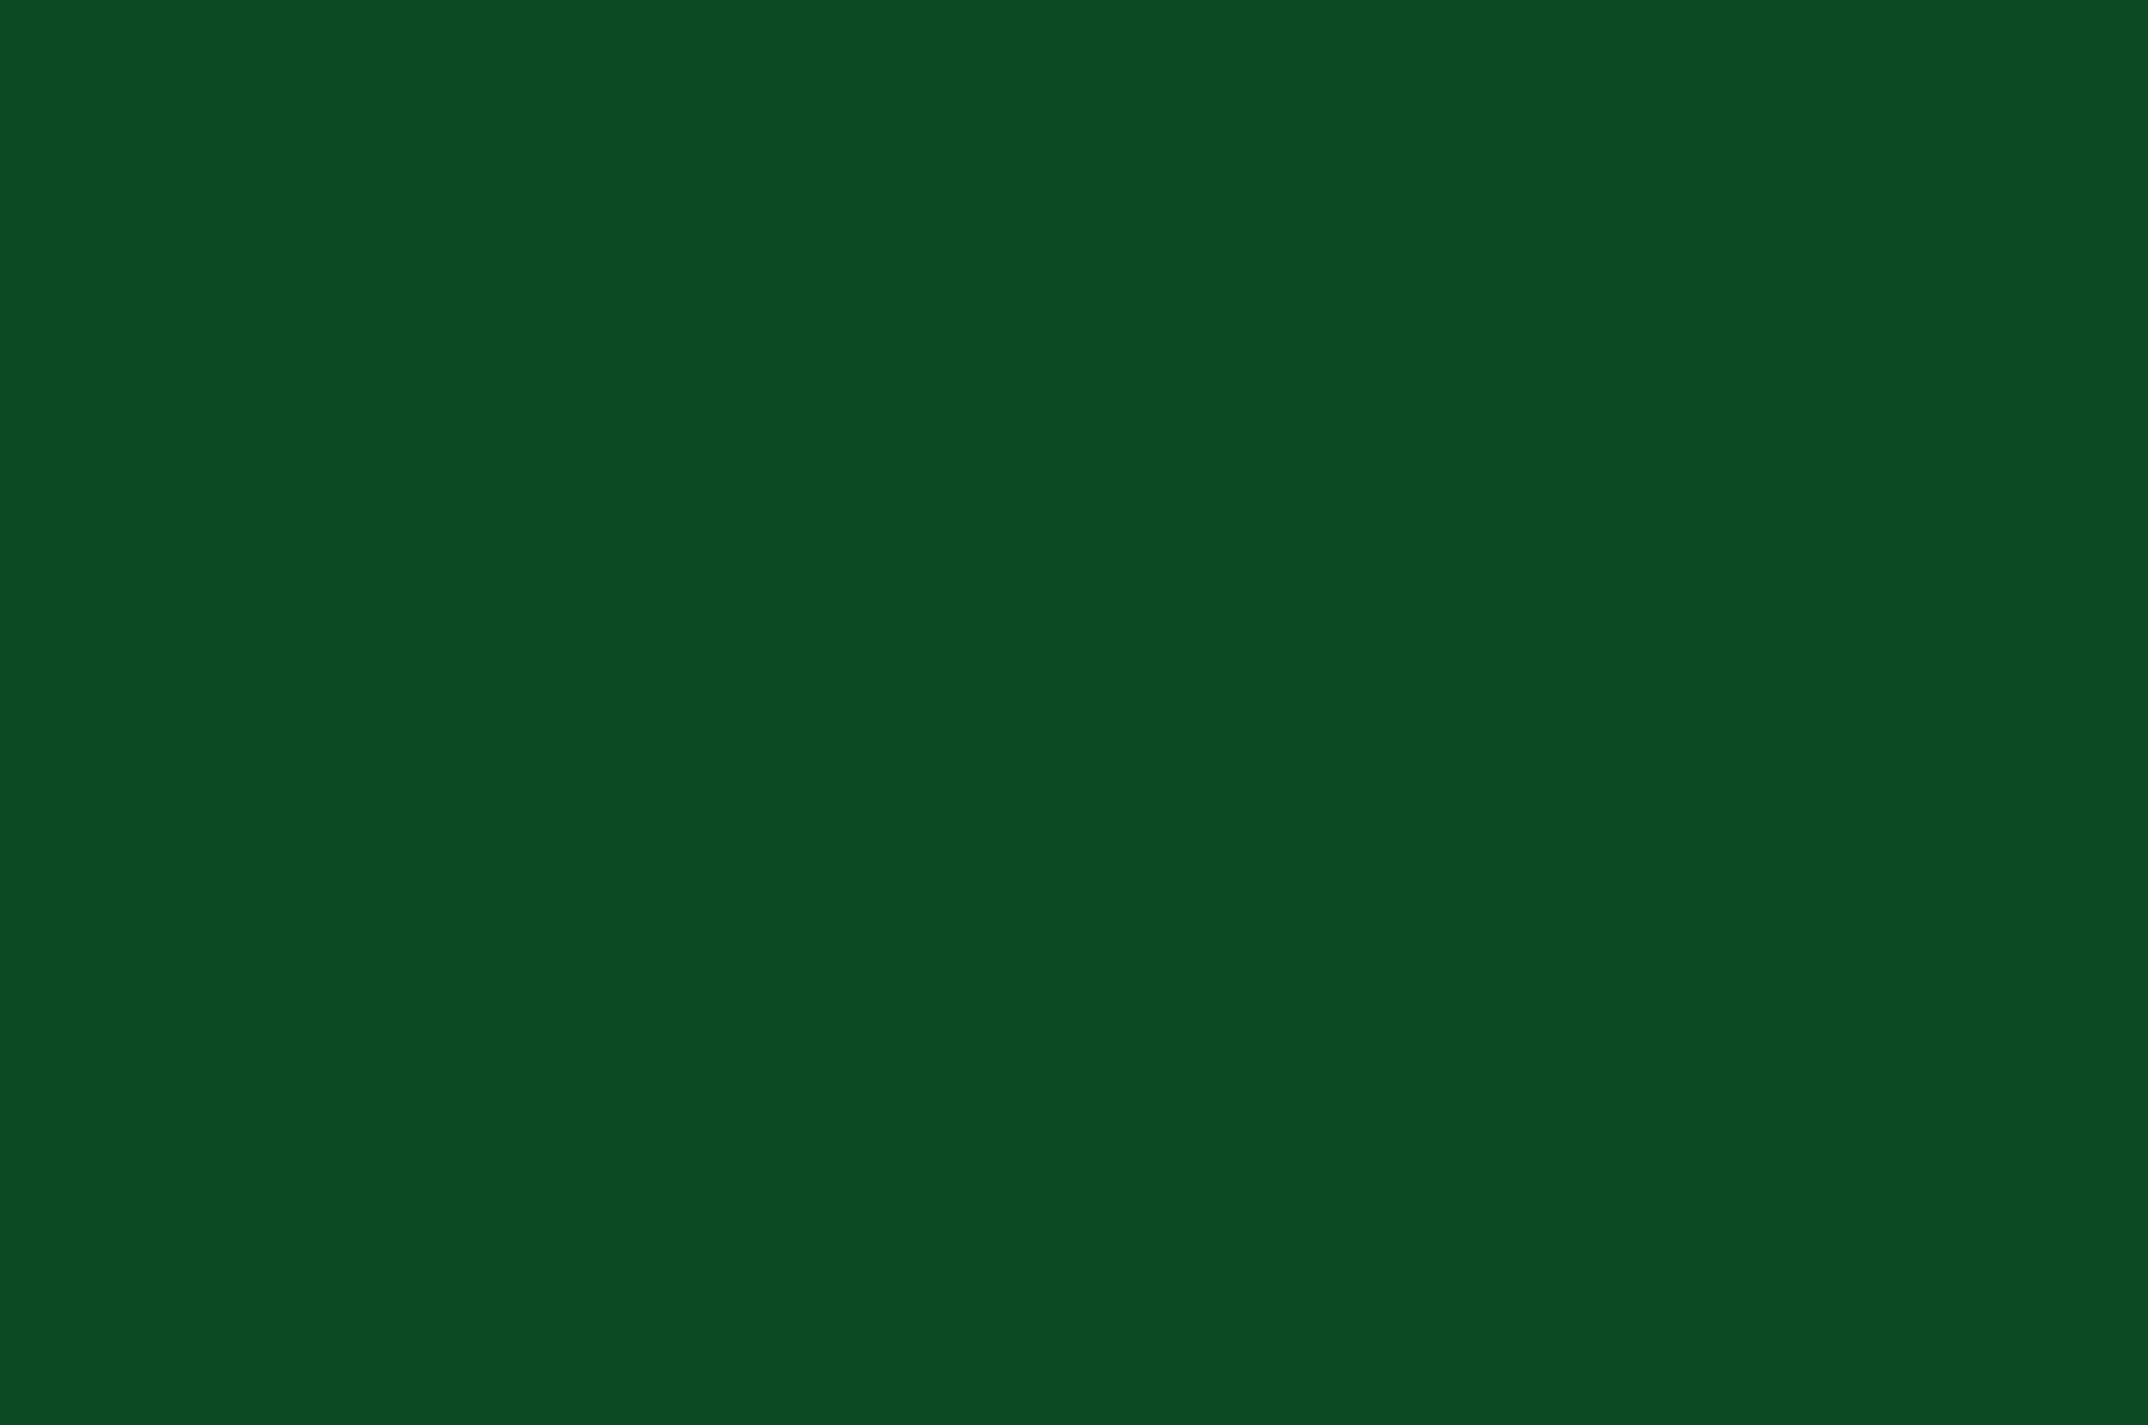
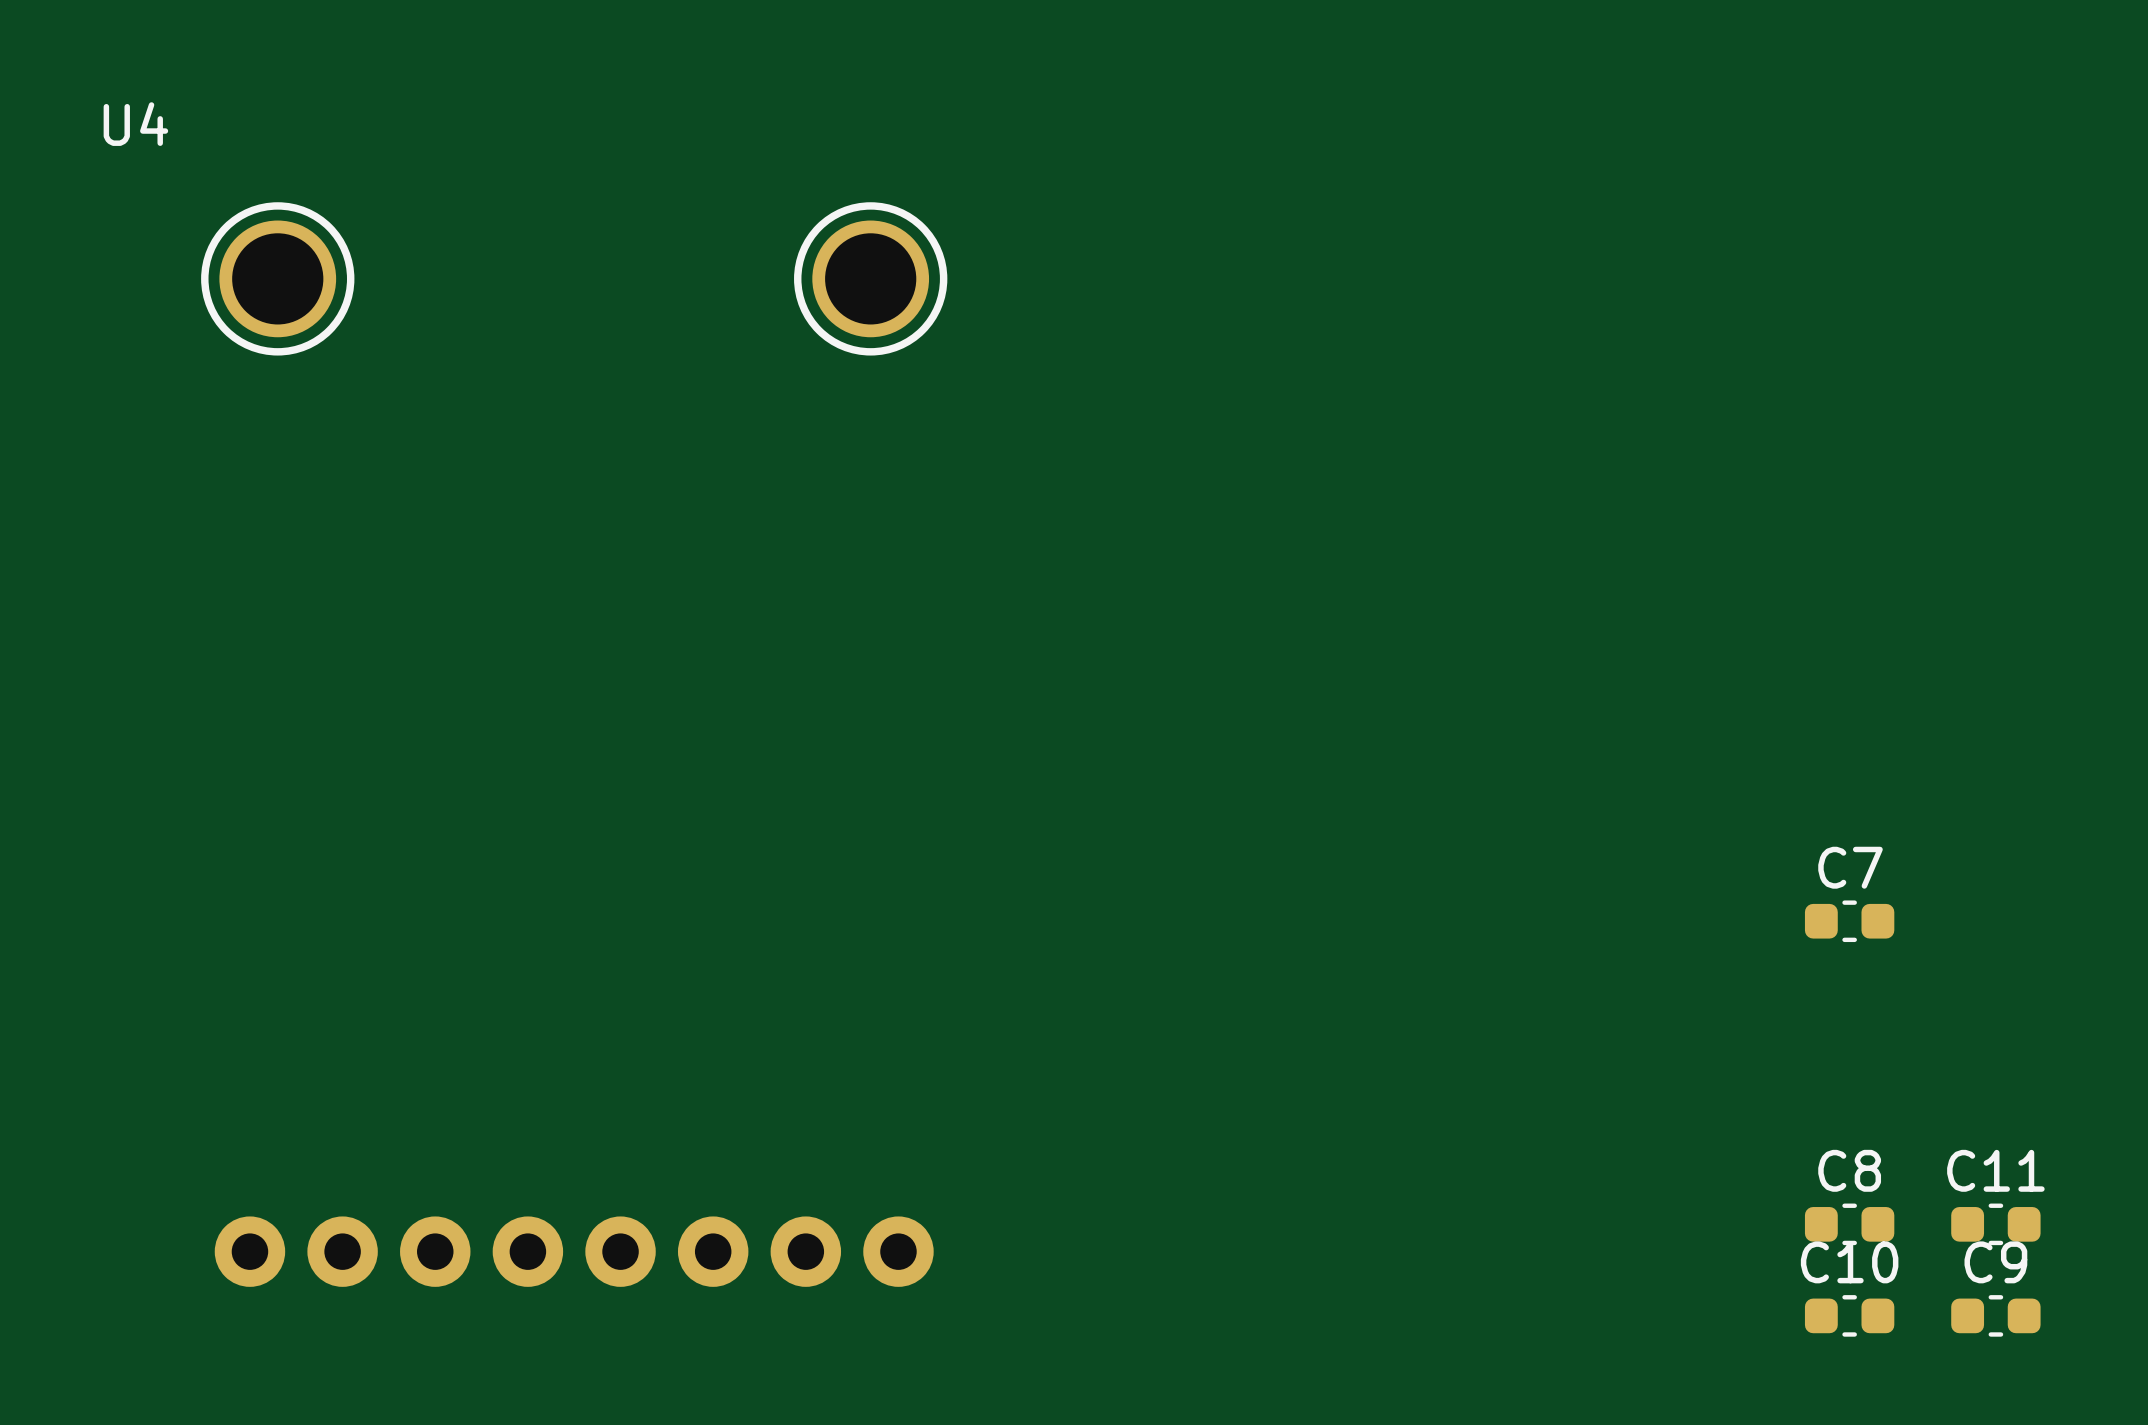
U4: none -> (574, 744)
C7: none -> (1849, 921)
C8: none -> (1849, 1224)
C11: none -> (1995, 1224)
C10: none -> (1849, 1315)
C9: none -> (1995, 1315)

